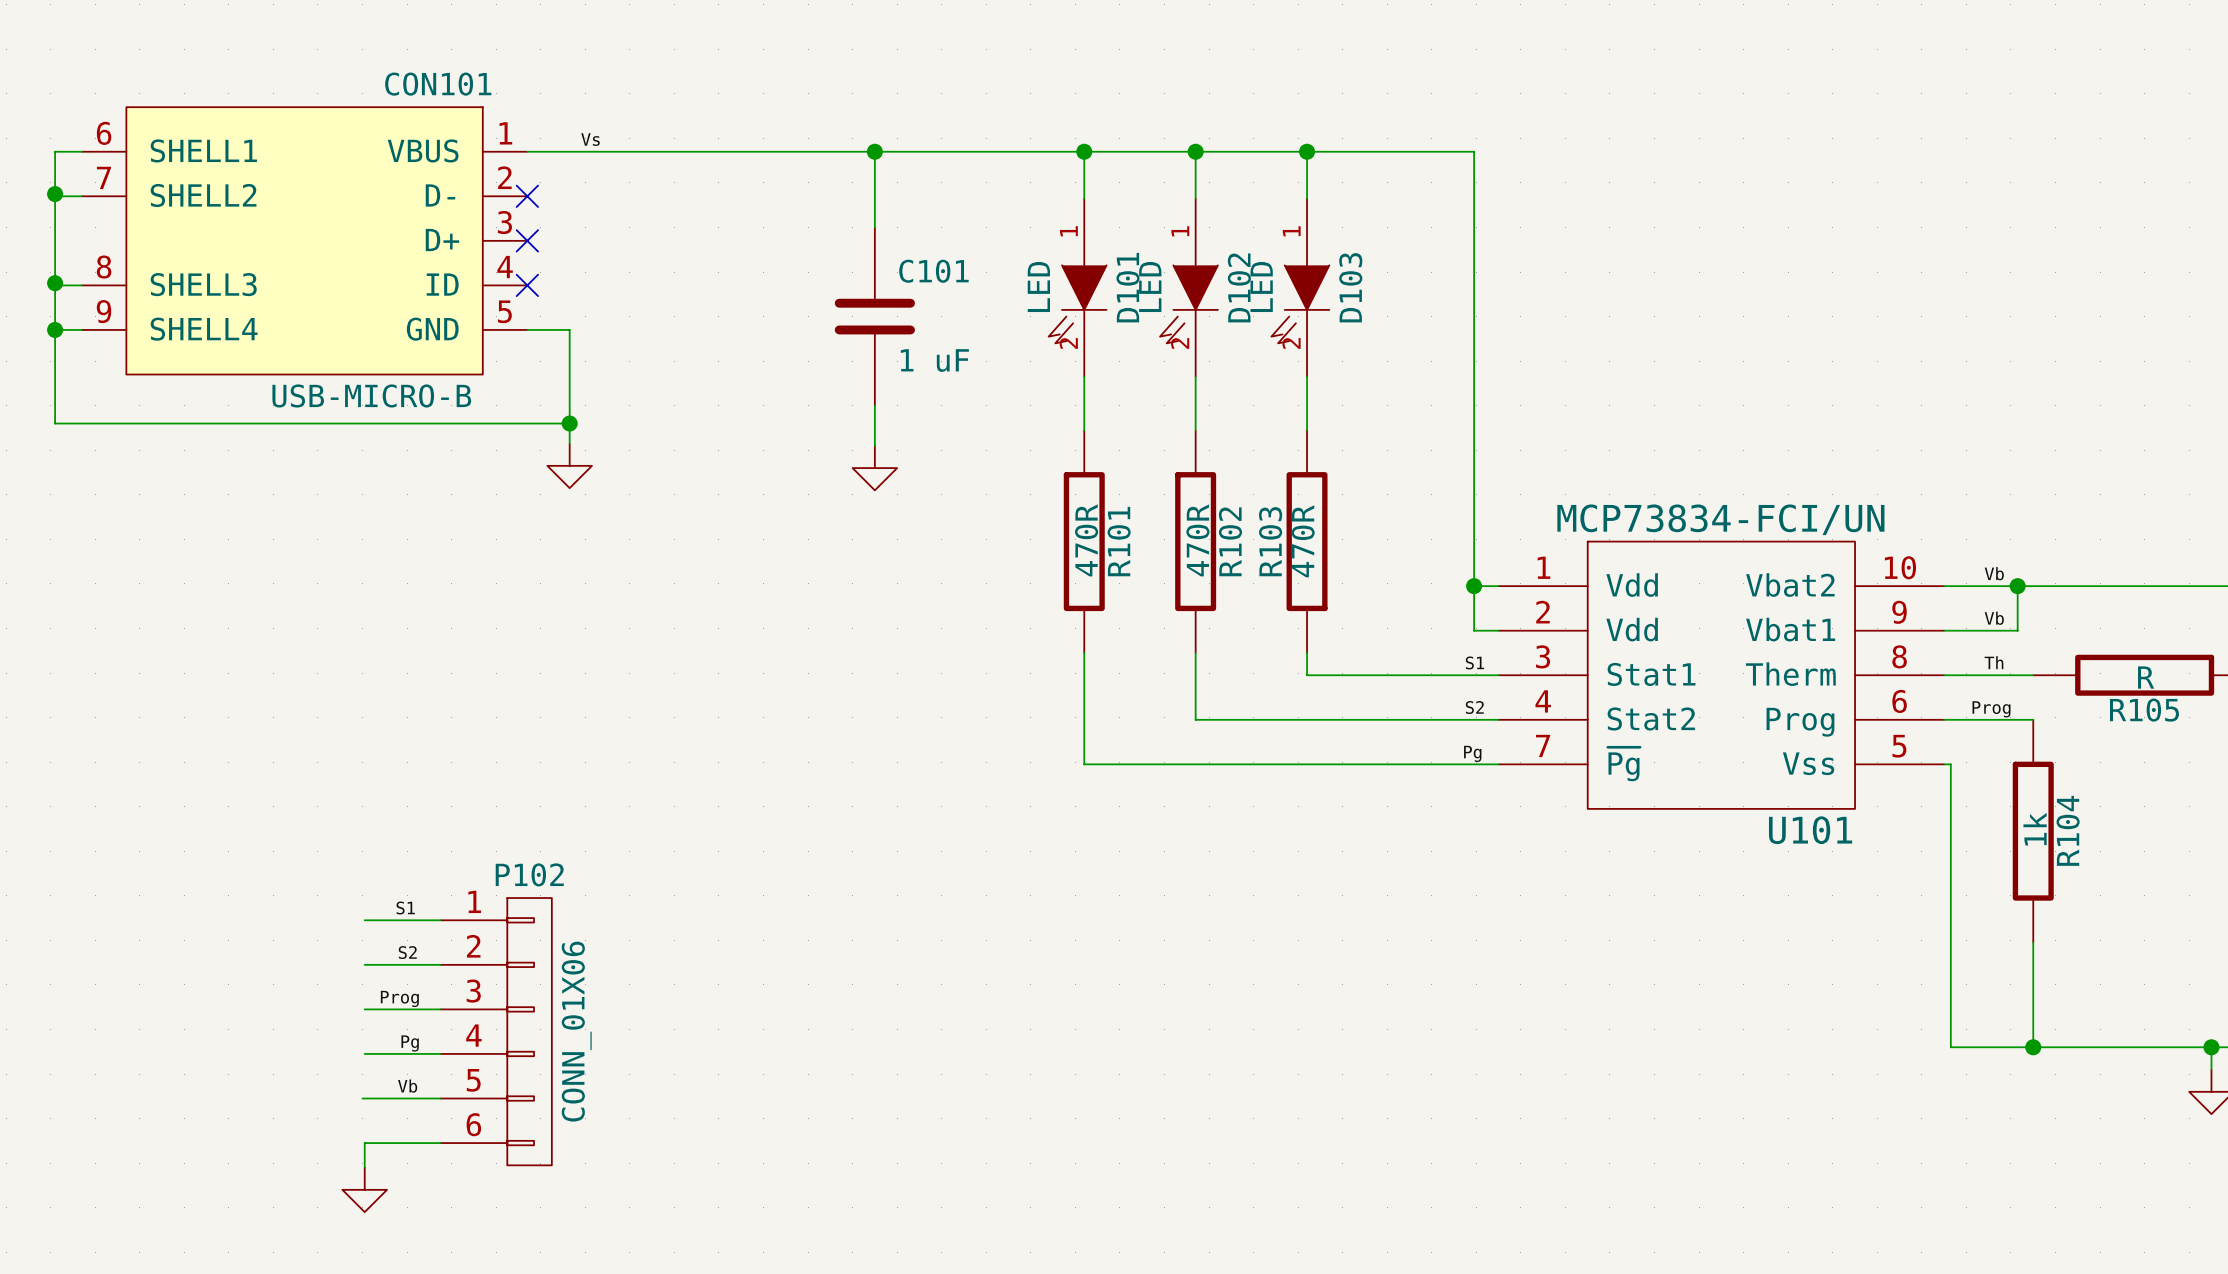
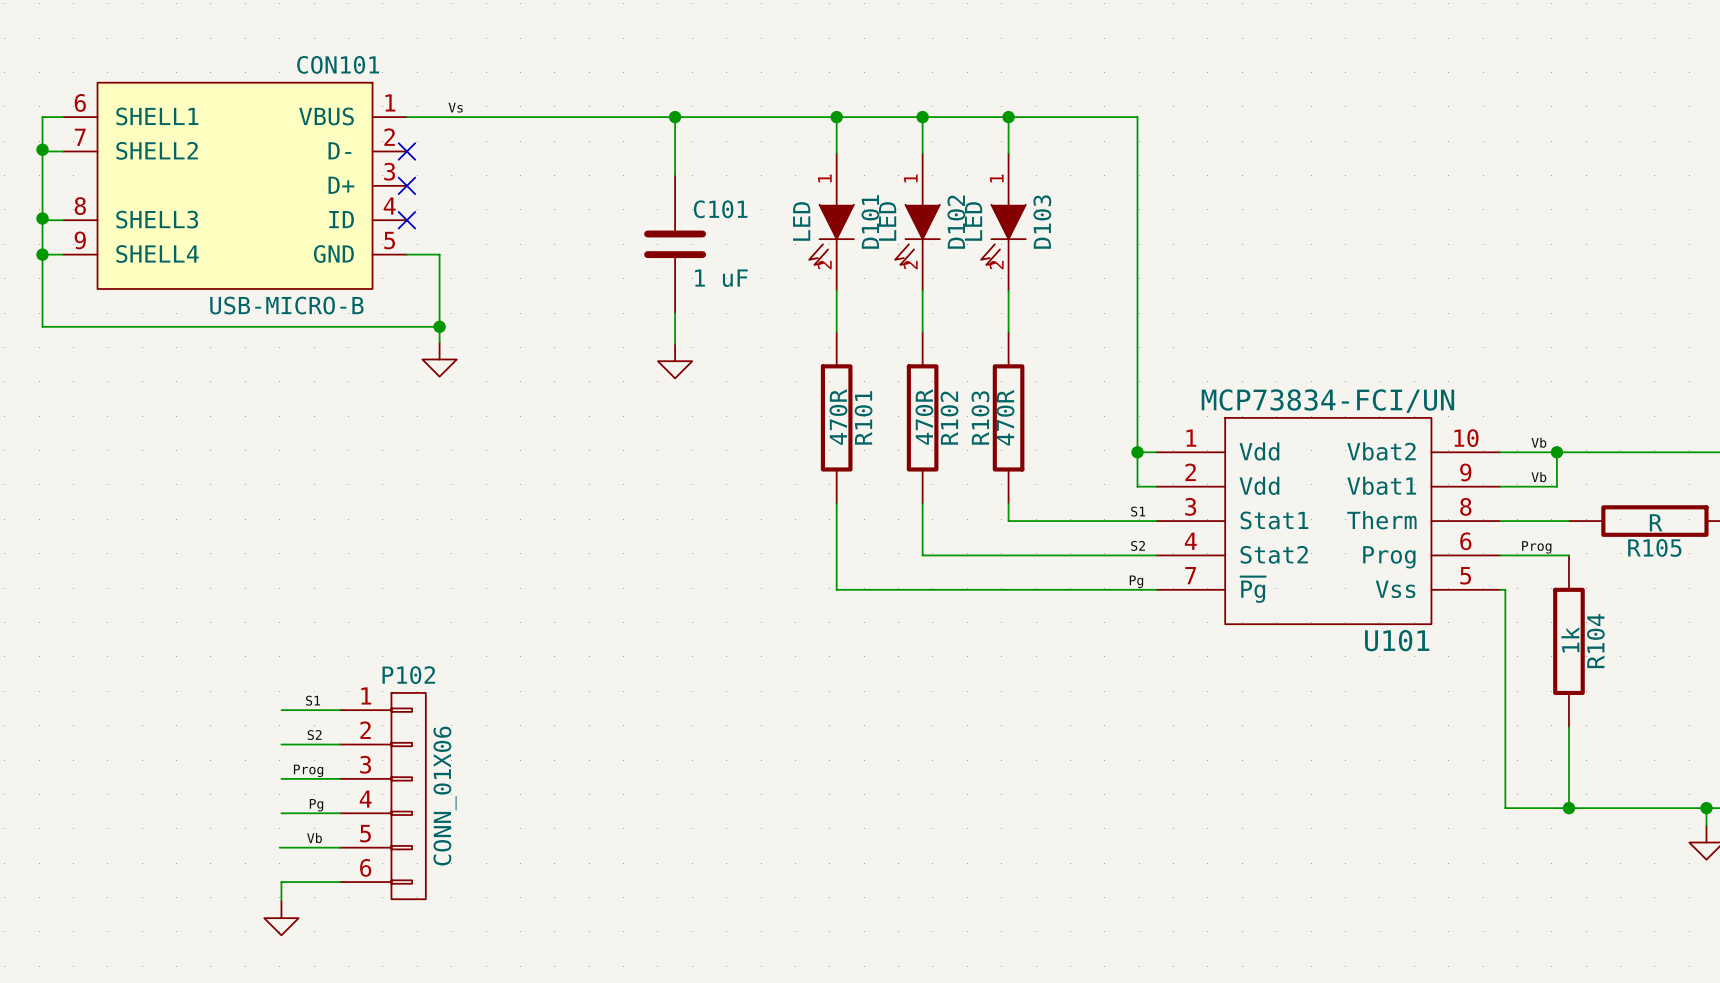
label: Th (1993, 662) -> none

